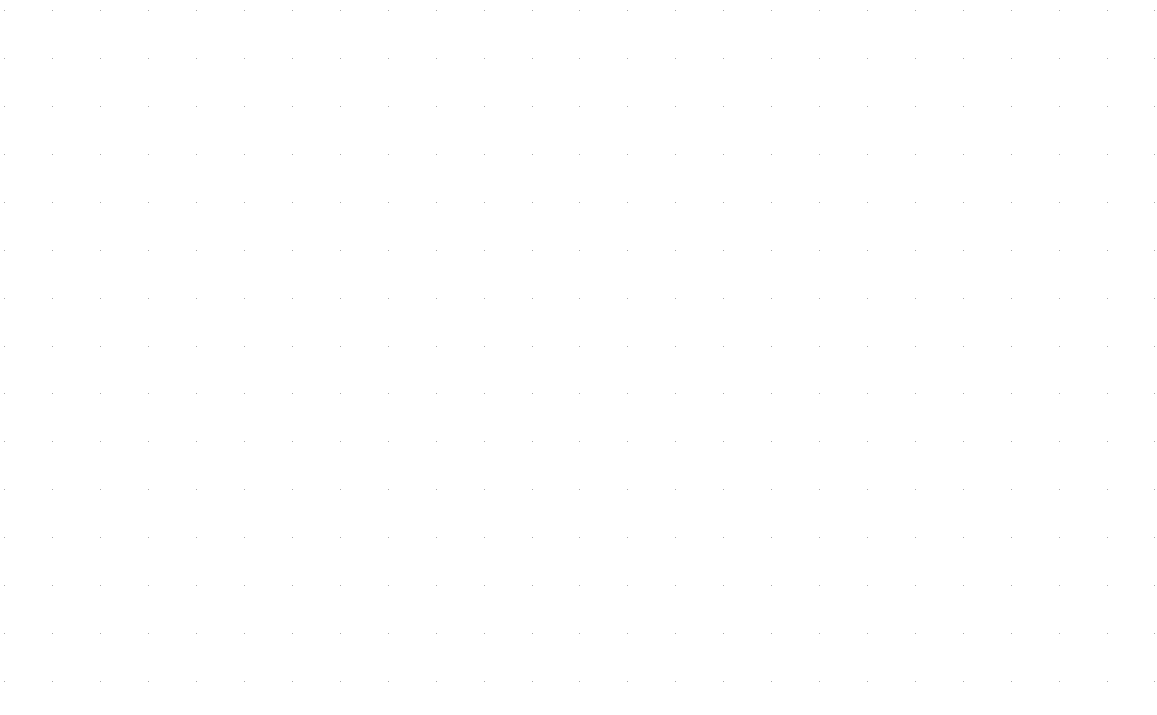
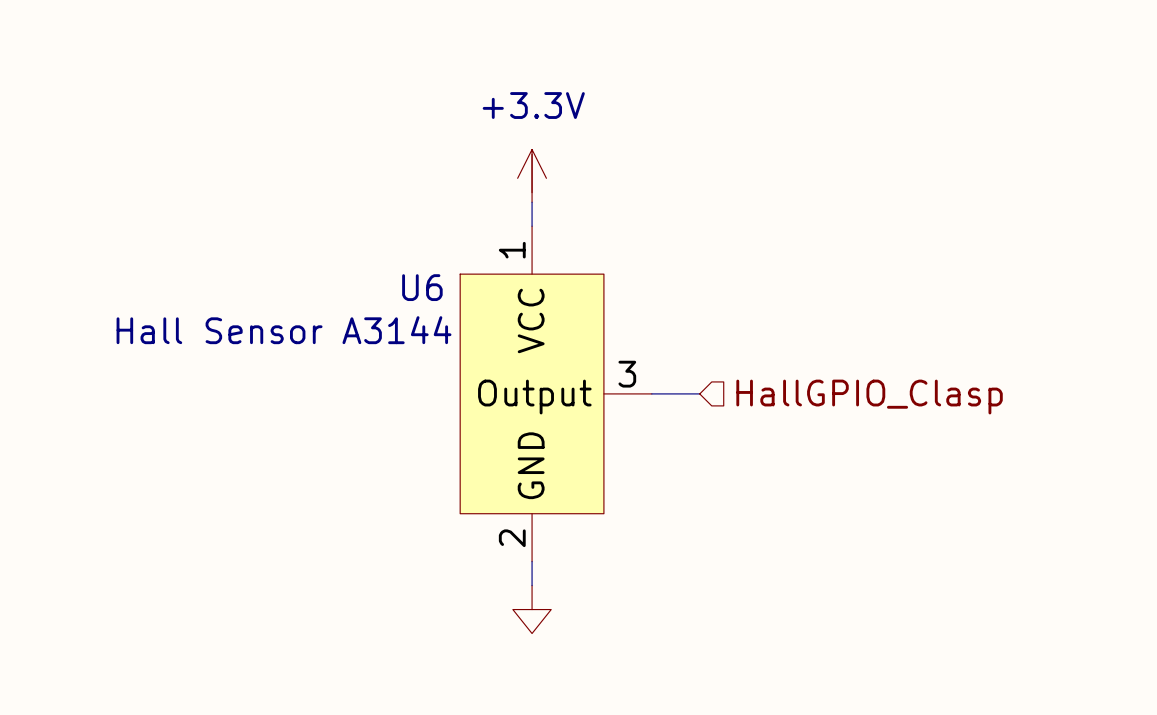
power symbol: none -> +3.3V (532, 175)
wire: none -> (532, 202) (532, 226)
U6: none -> Hall Sensor A3144 (556, 393)
wire: none -> (651, 393) (699, 393)
hierarchical label: none -> HallGPIO_Clasp (869, 397)
wire: none -> (532, 561) (532, 585)
power symbol: none -> (532, 609)

